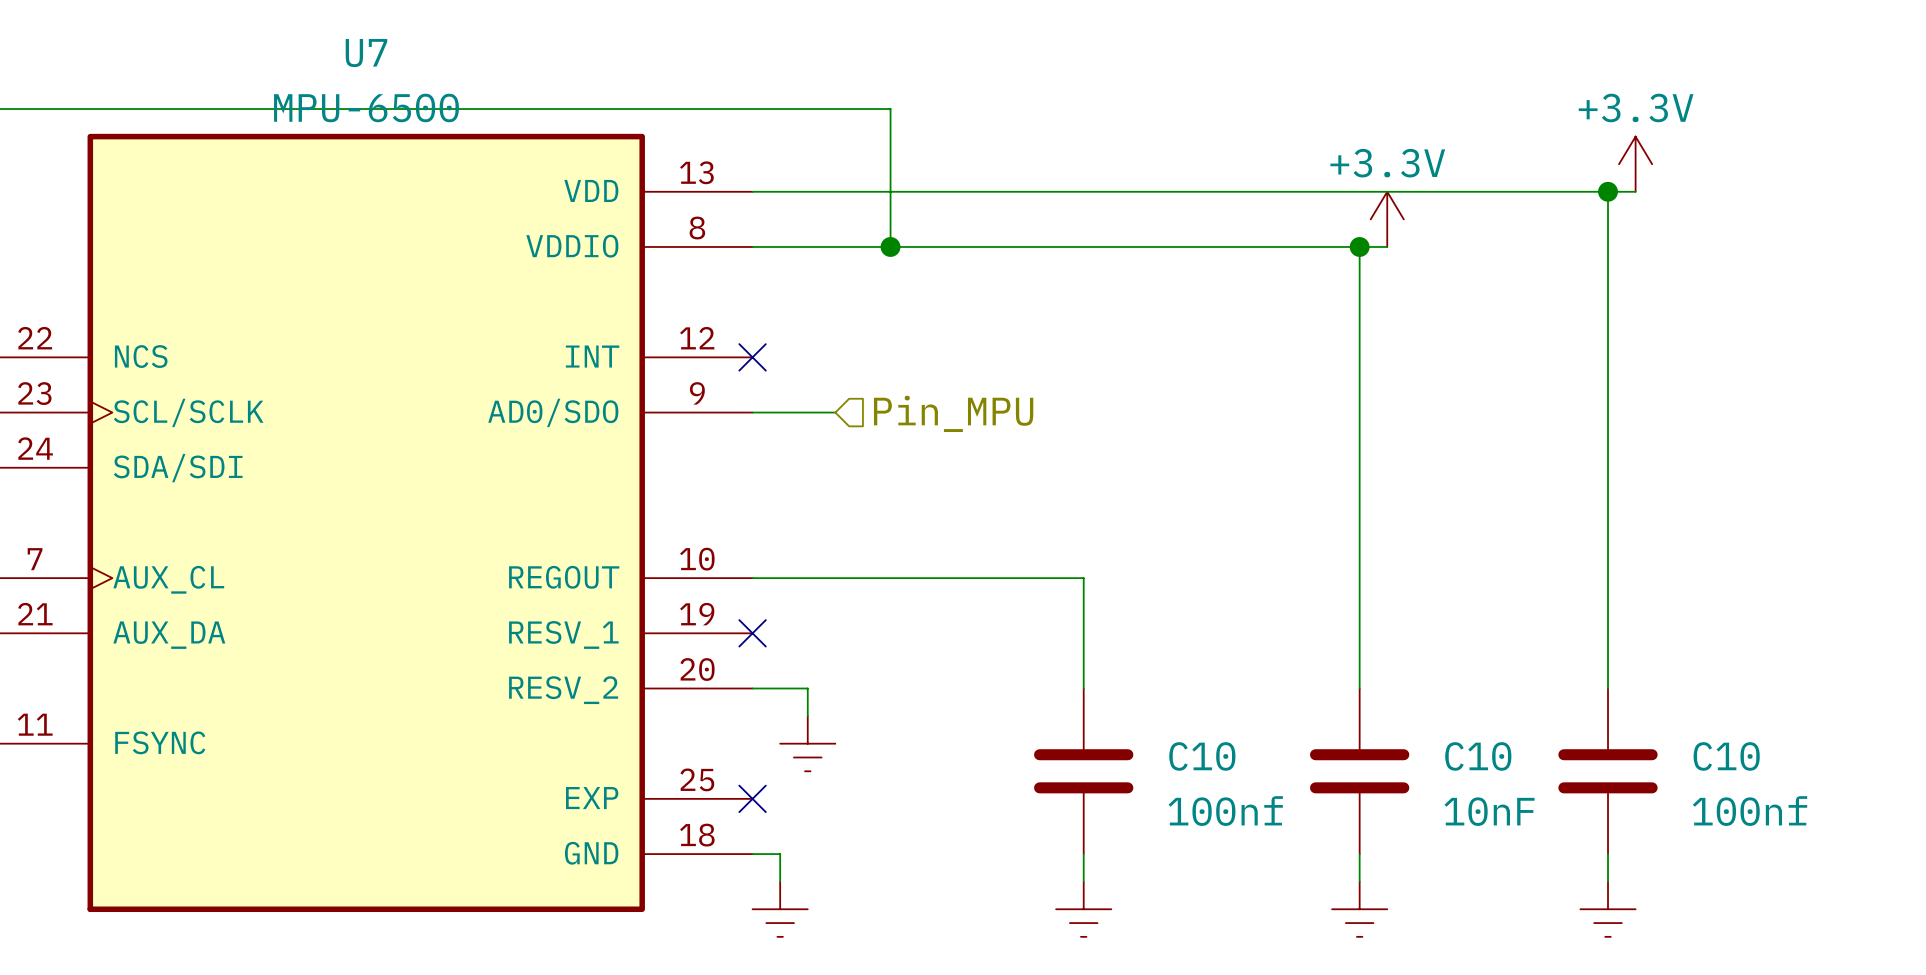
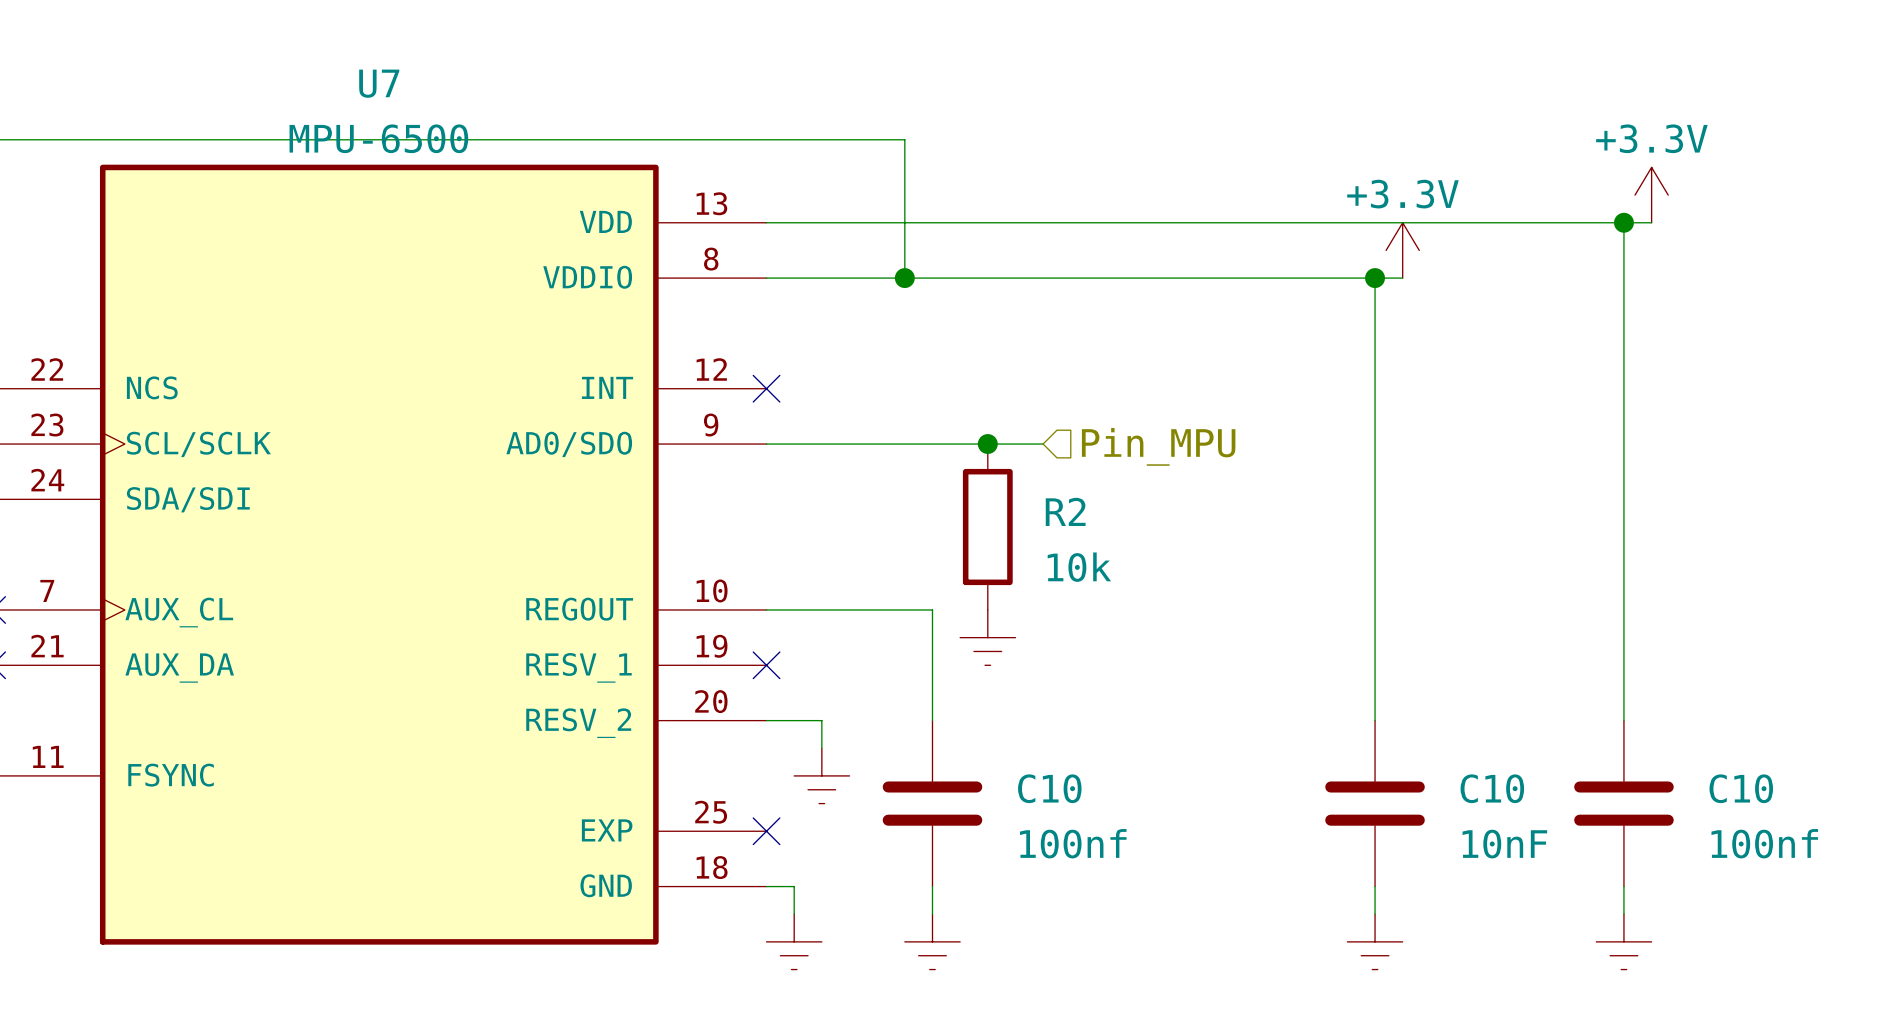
wire: none -> (849, 444) (1043, 444)
junction: none -> (987, 444)
hierarchical label position: Pin_MPU (953, 413) -> Pin_MPU (1158, 446)
R2: none -> 10k (987, 527)
wire: (918, 578) (1083, 578) (1083, 688) -> (932, 609) (932, 720)
power symbol: none -> (987, 637)
C10 position: (1083, 771) -> (932, 803)
wire: (1083, 854) (1083, 881) -> (932, 886) (932, 914)
power symbol: none -> (932, 941)
power symbol: (1083, 909) -> none

